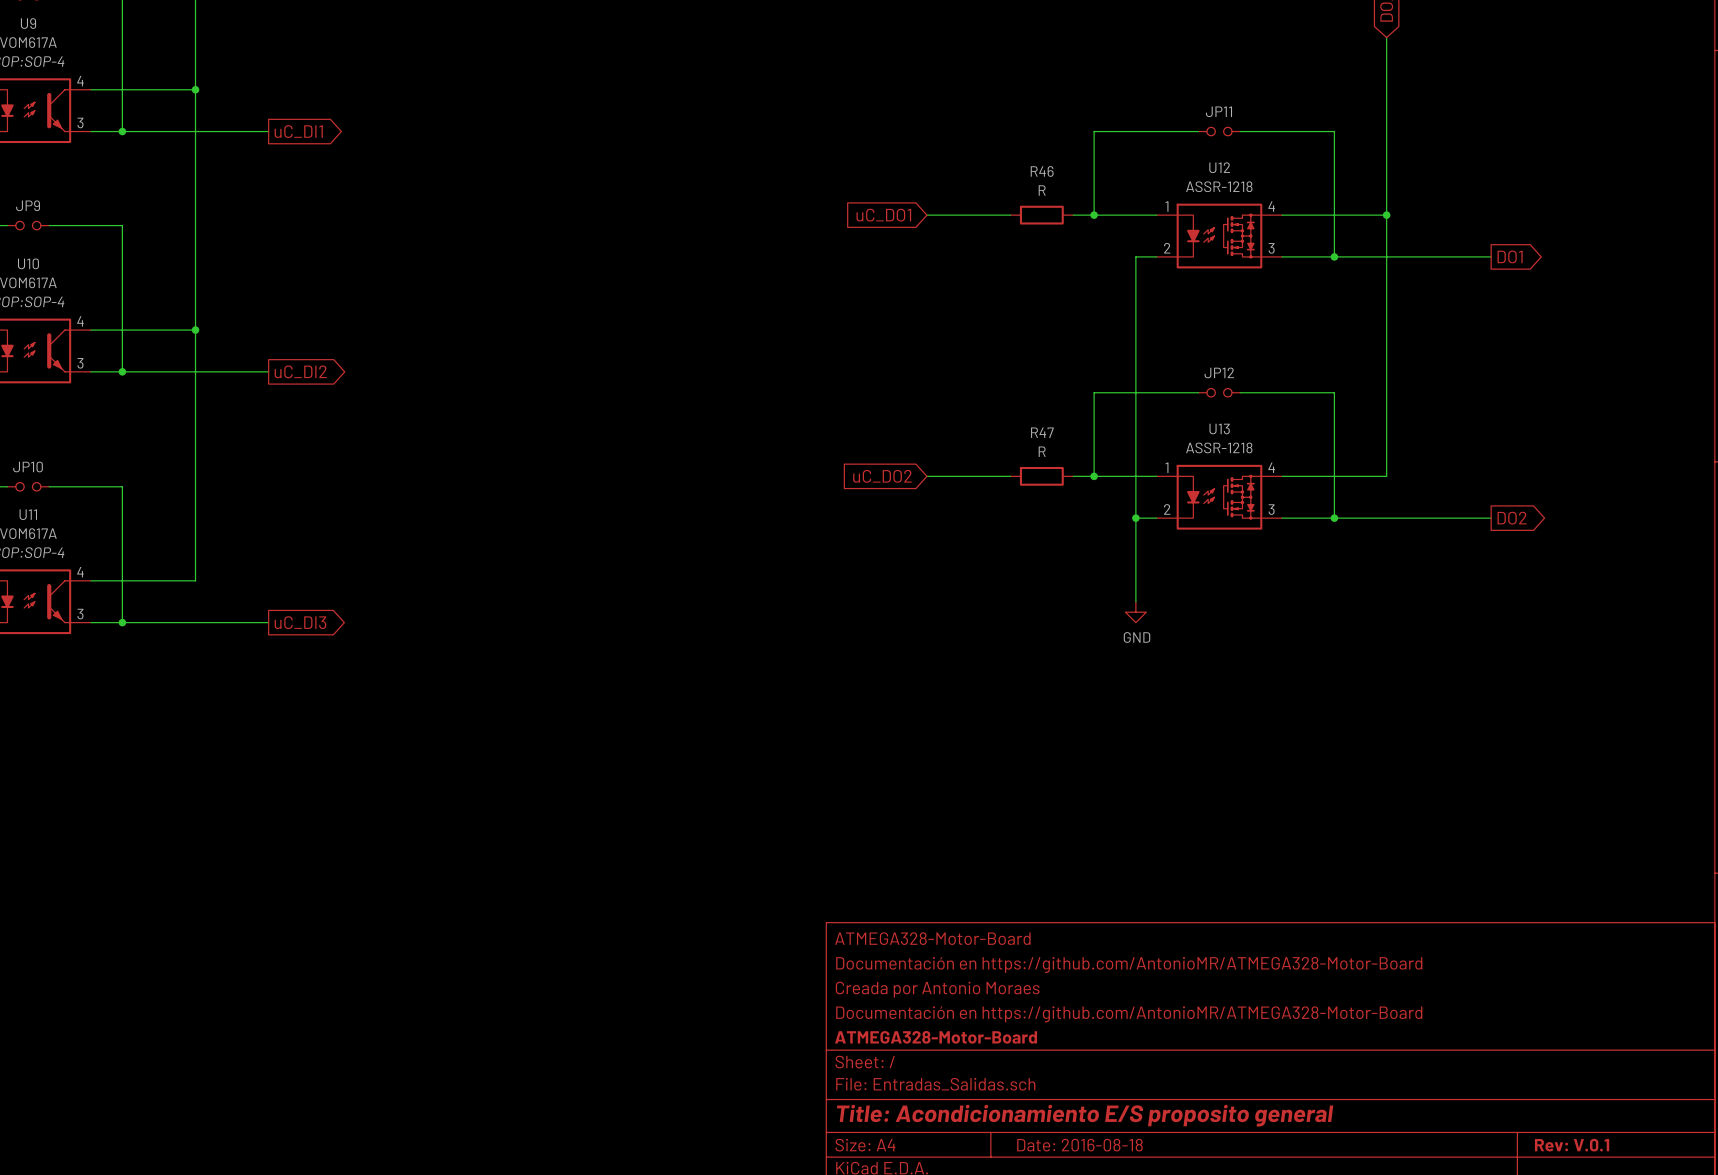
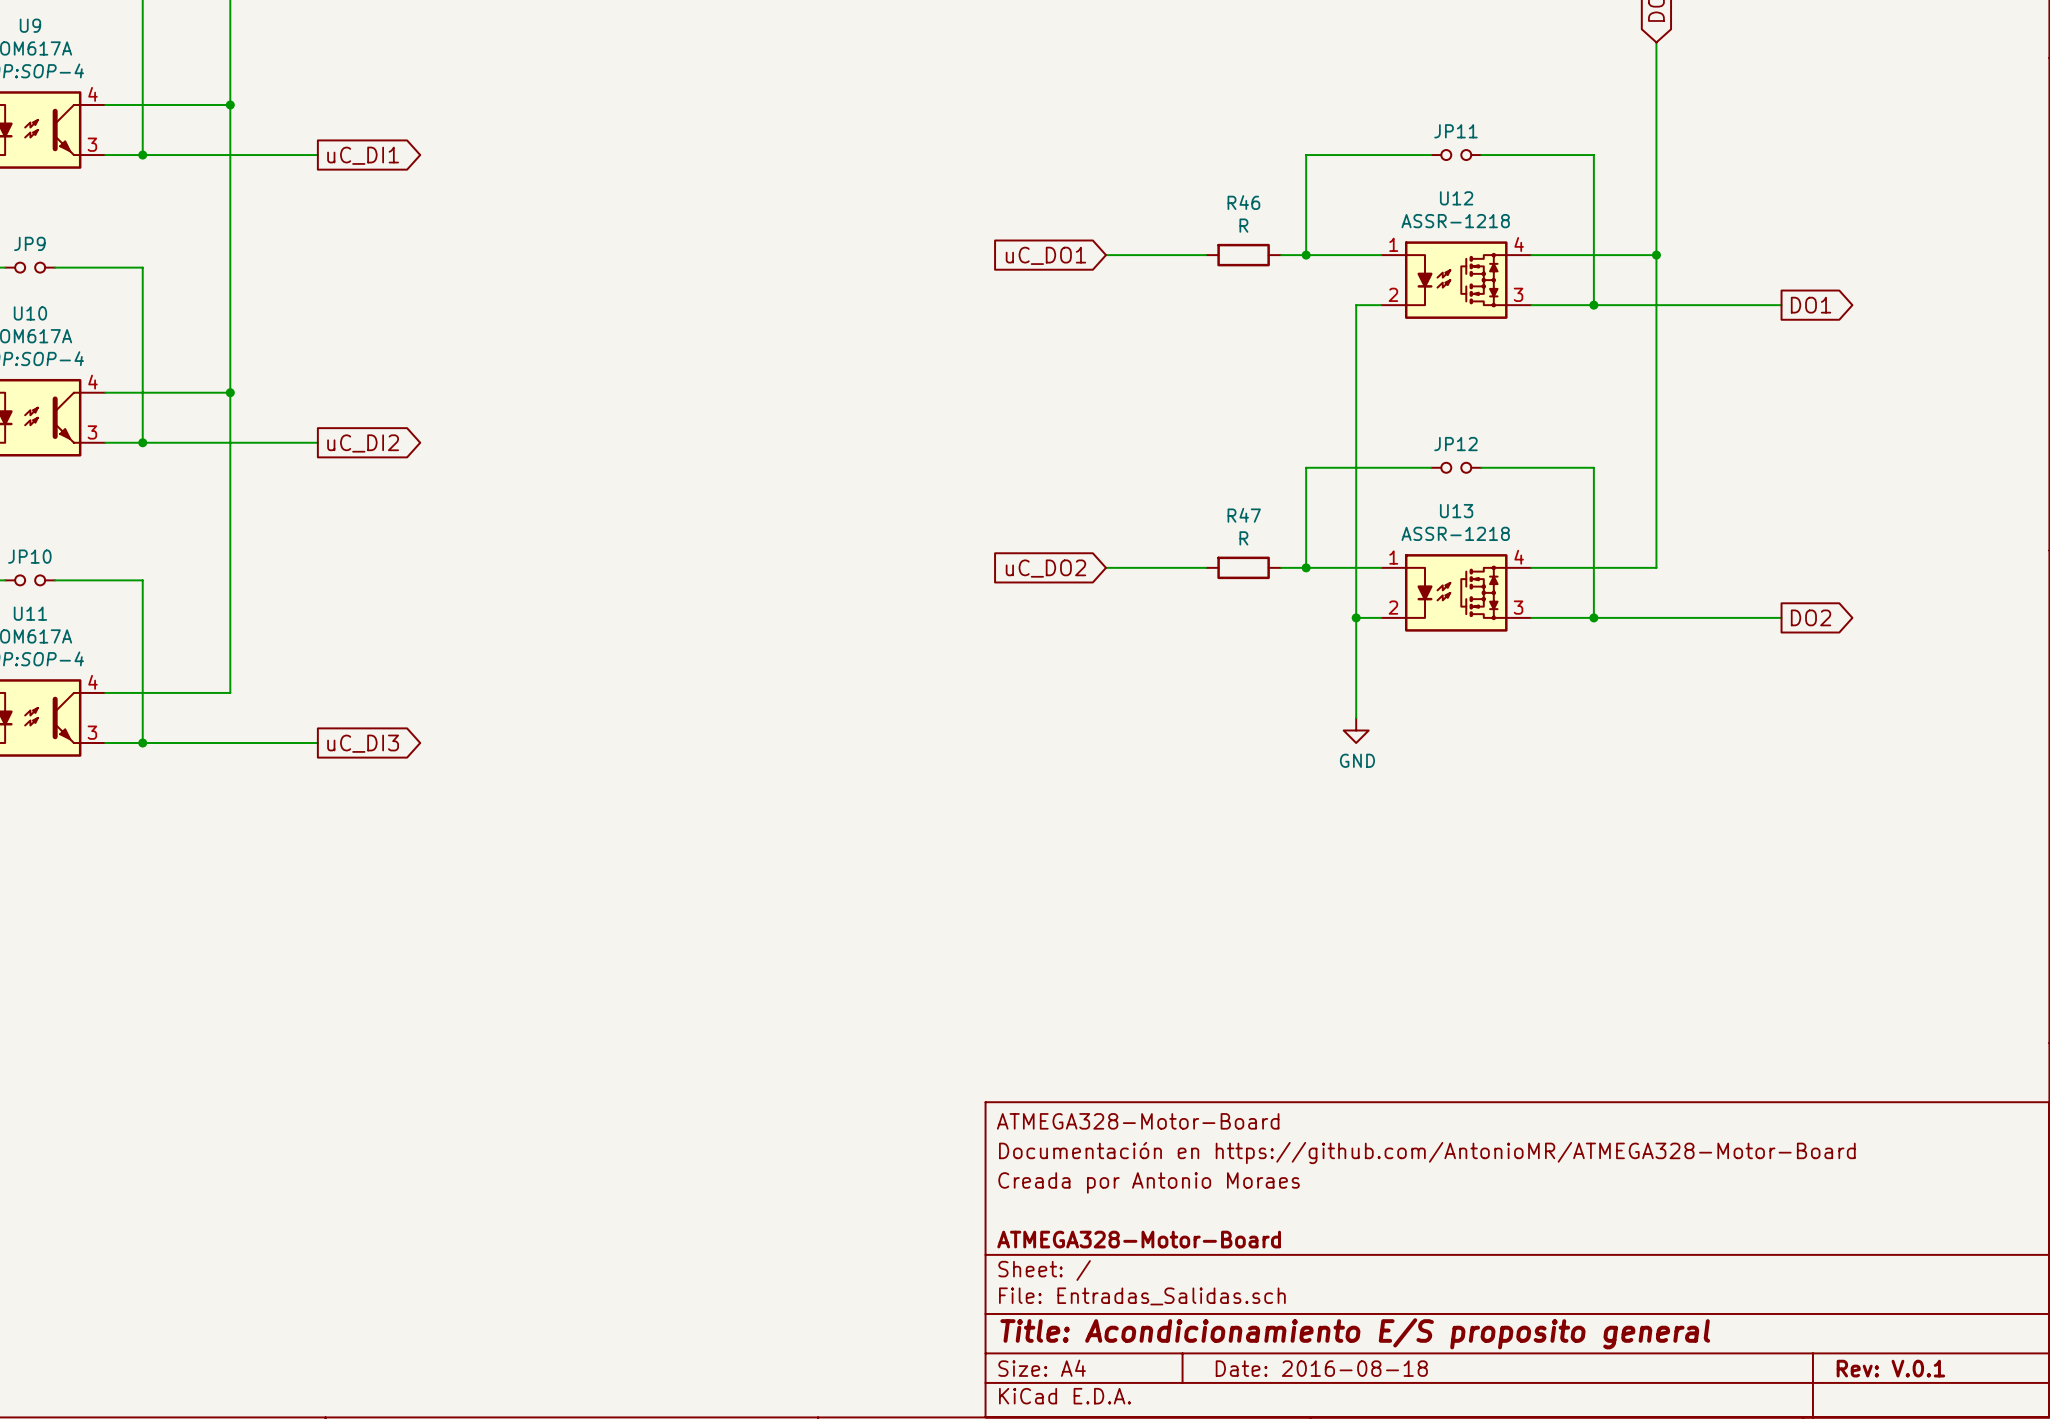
title block: Documentación en https://github.com/AntonioMR/ATMEGA328-Motor-Board (1129, 1014) -> none

